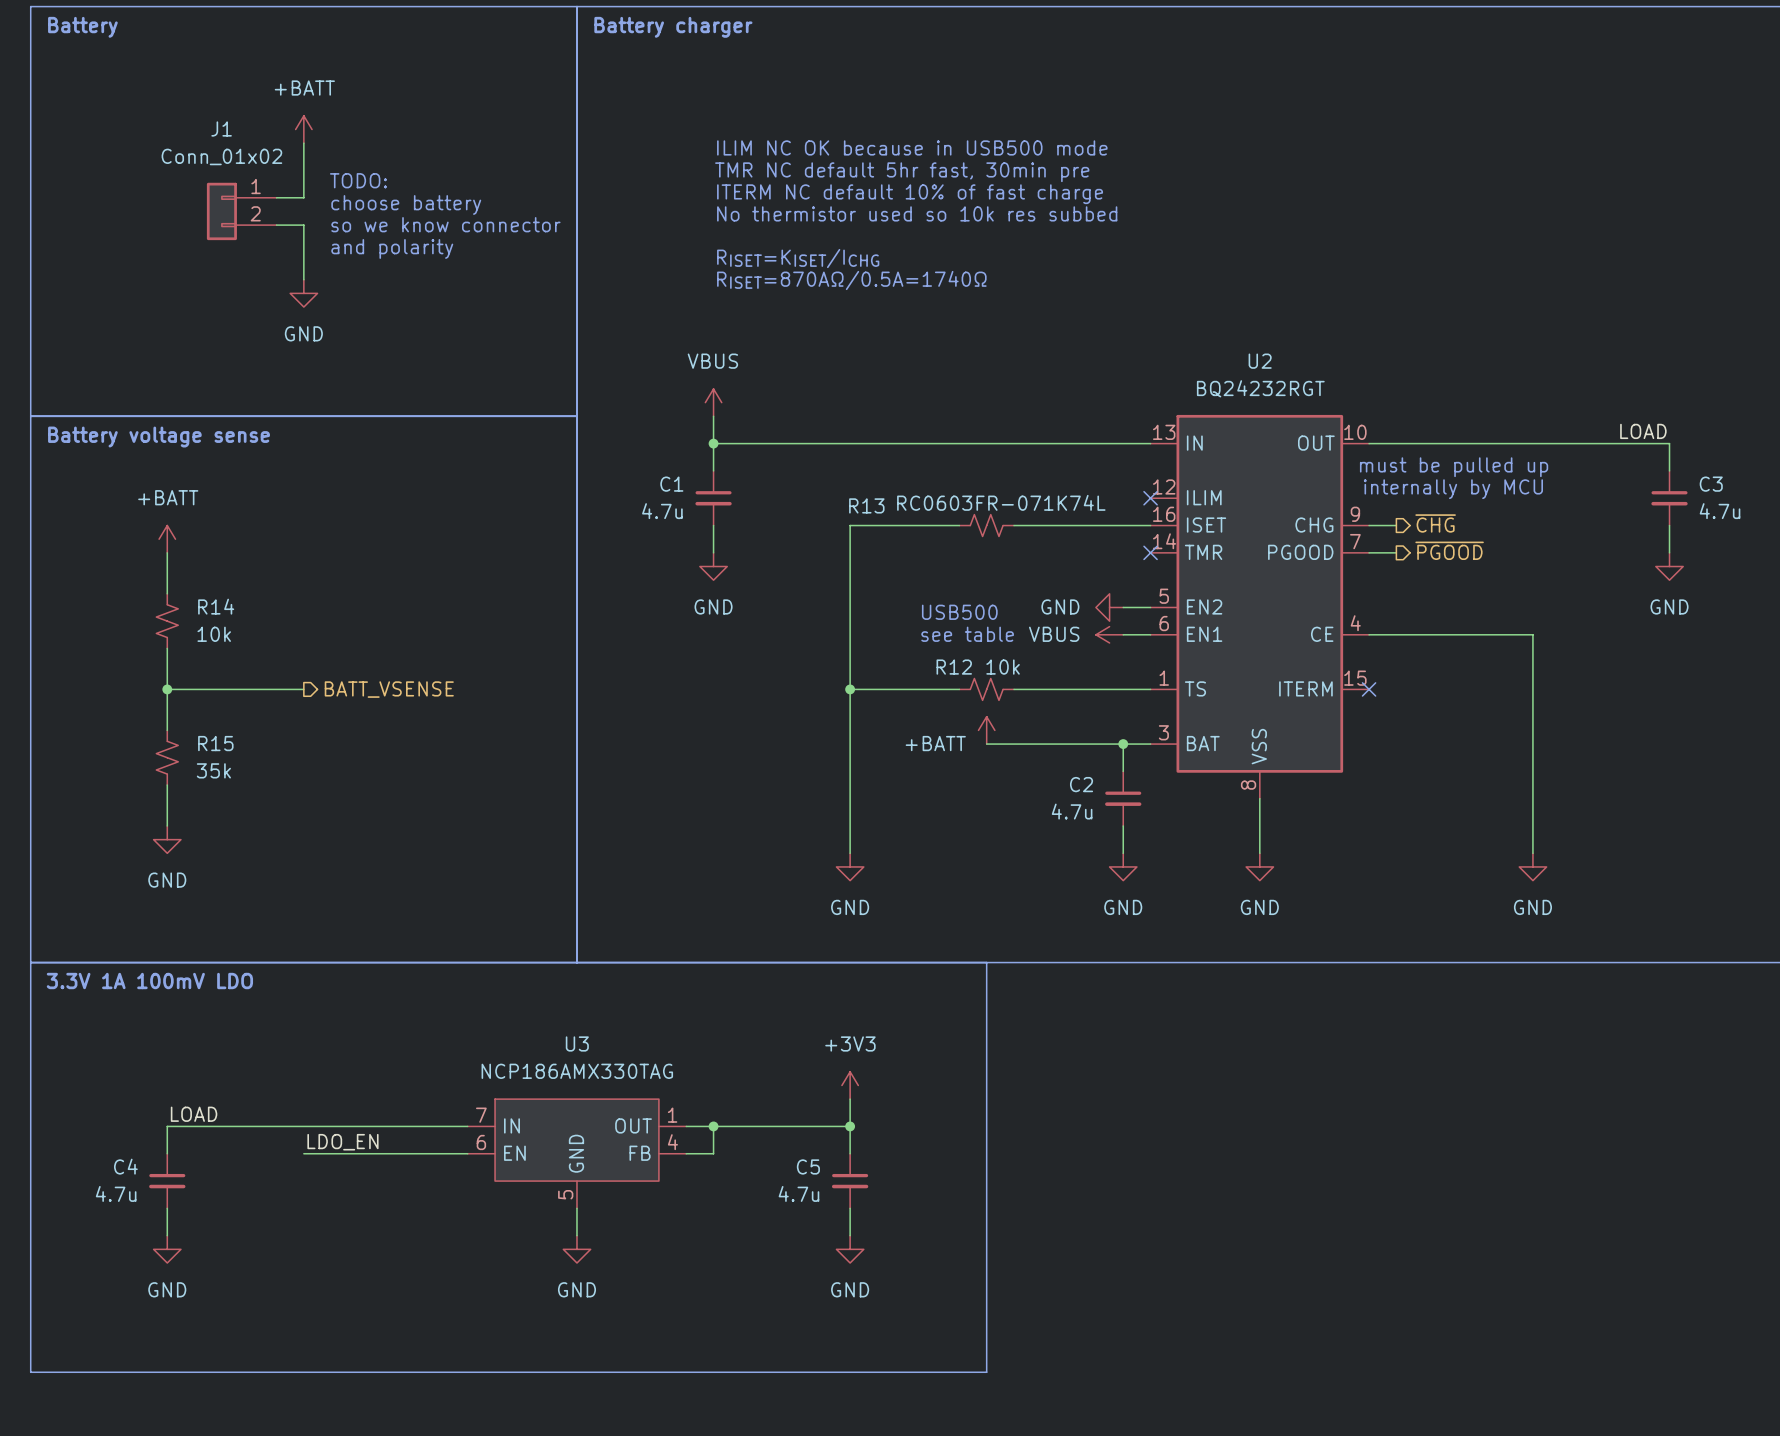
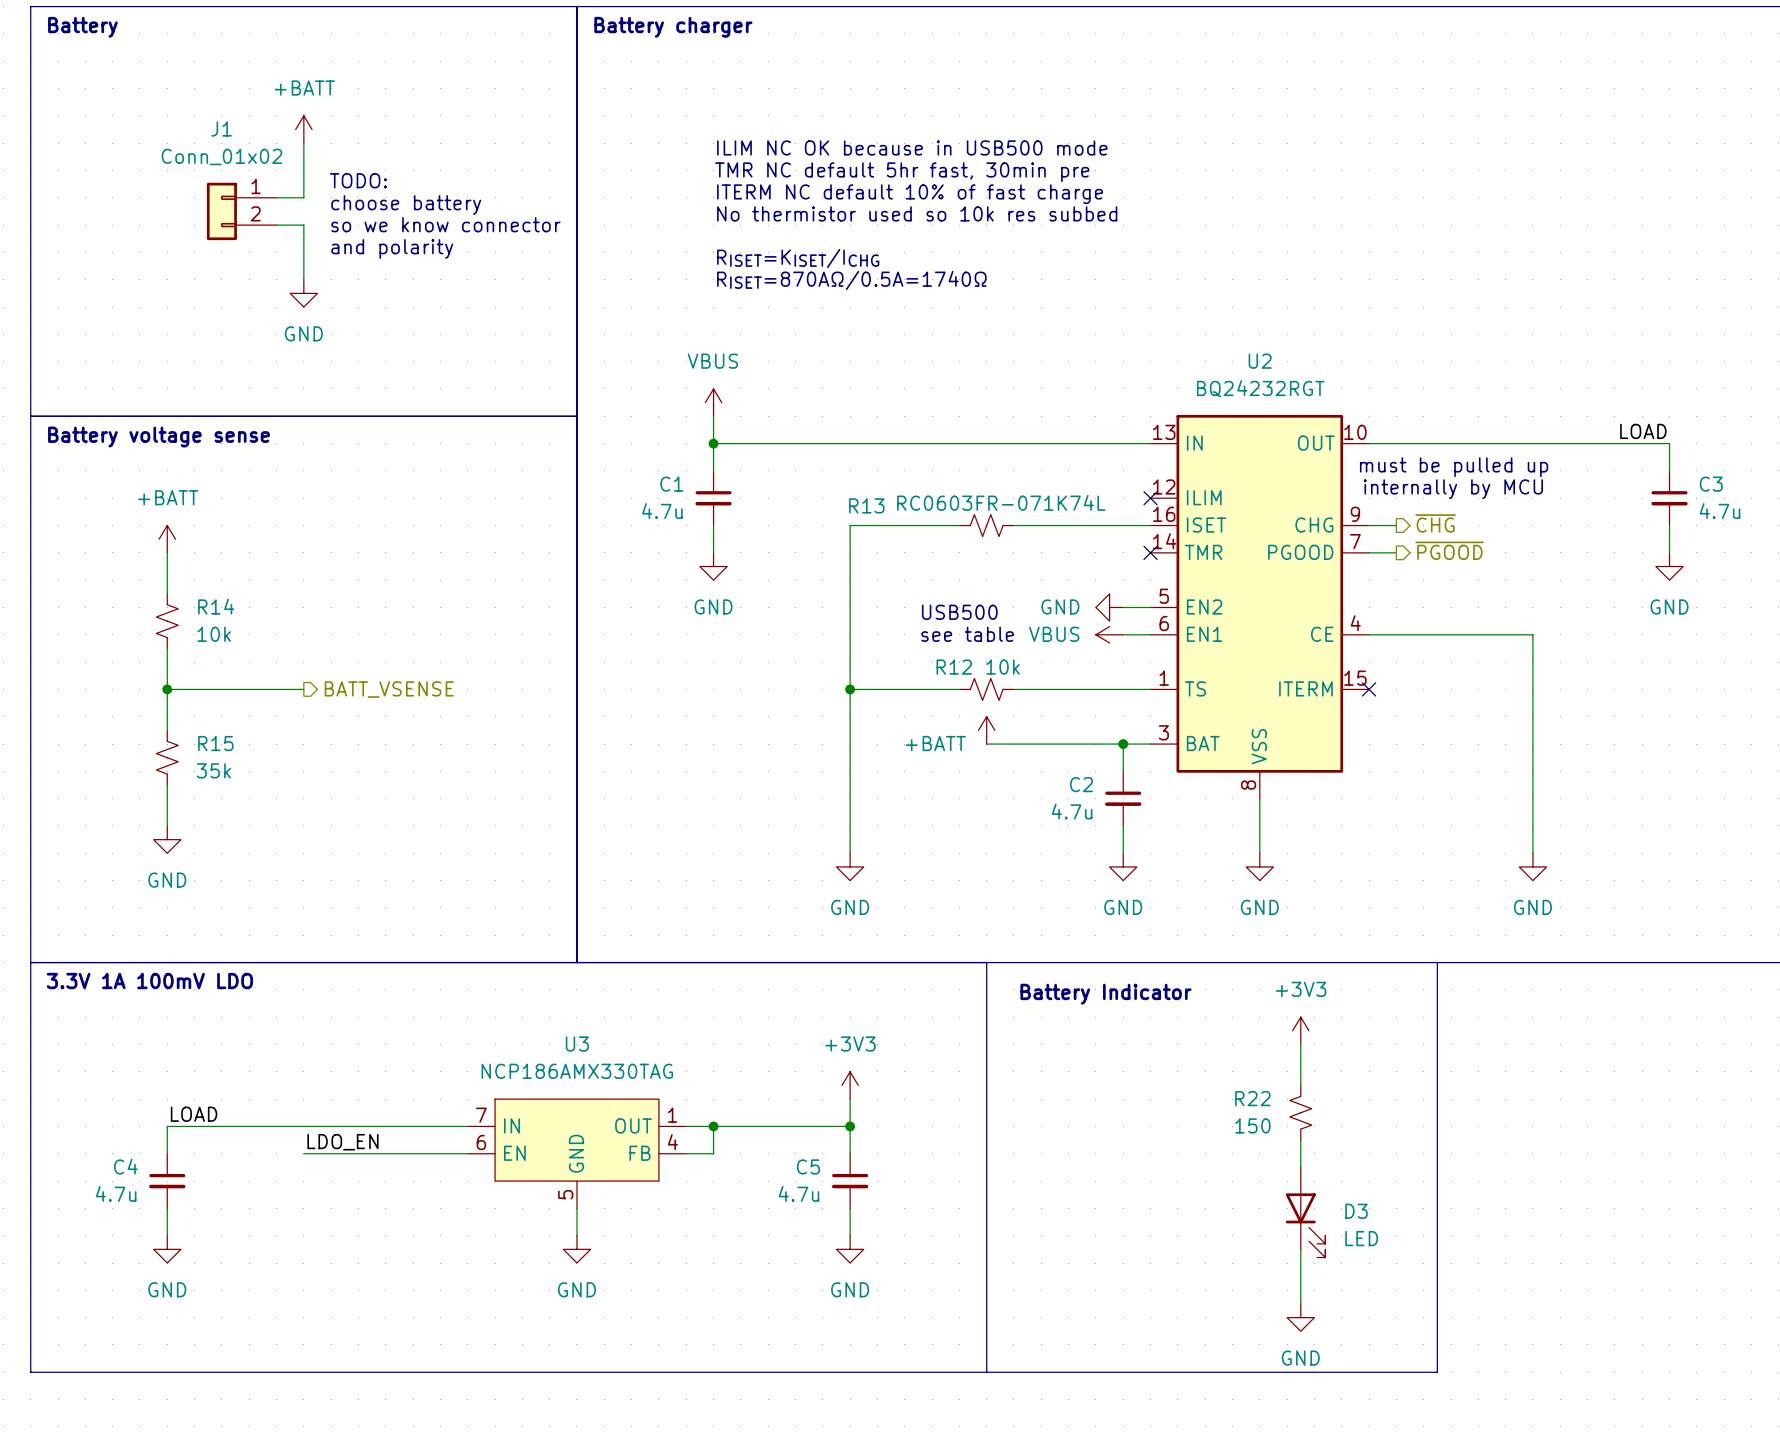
line: none -> (1437, 962) (1437, 1372) (986, 1372)
text: none -> Battery Indicator (1105, 994)
power symbol: none -> +3V3 (1300, 1030)
wire: none -> (1300, 1044) (1300, 1085)
R22: none -> 150 (1300, 1112)
wire: none -> (1300, 1140) (1300, 1167)
D3: none -> LED (1305, 1212)
wire: none -> (1300, 1249) (1300, 1303)
power symbol: none -> GND (1300, 1317)

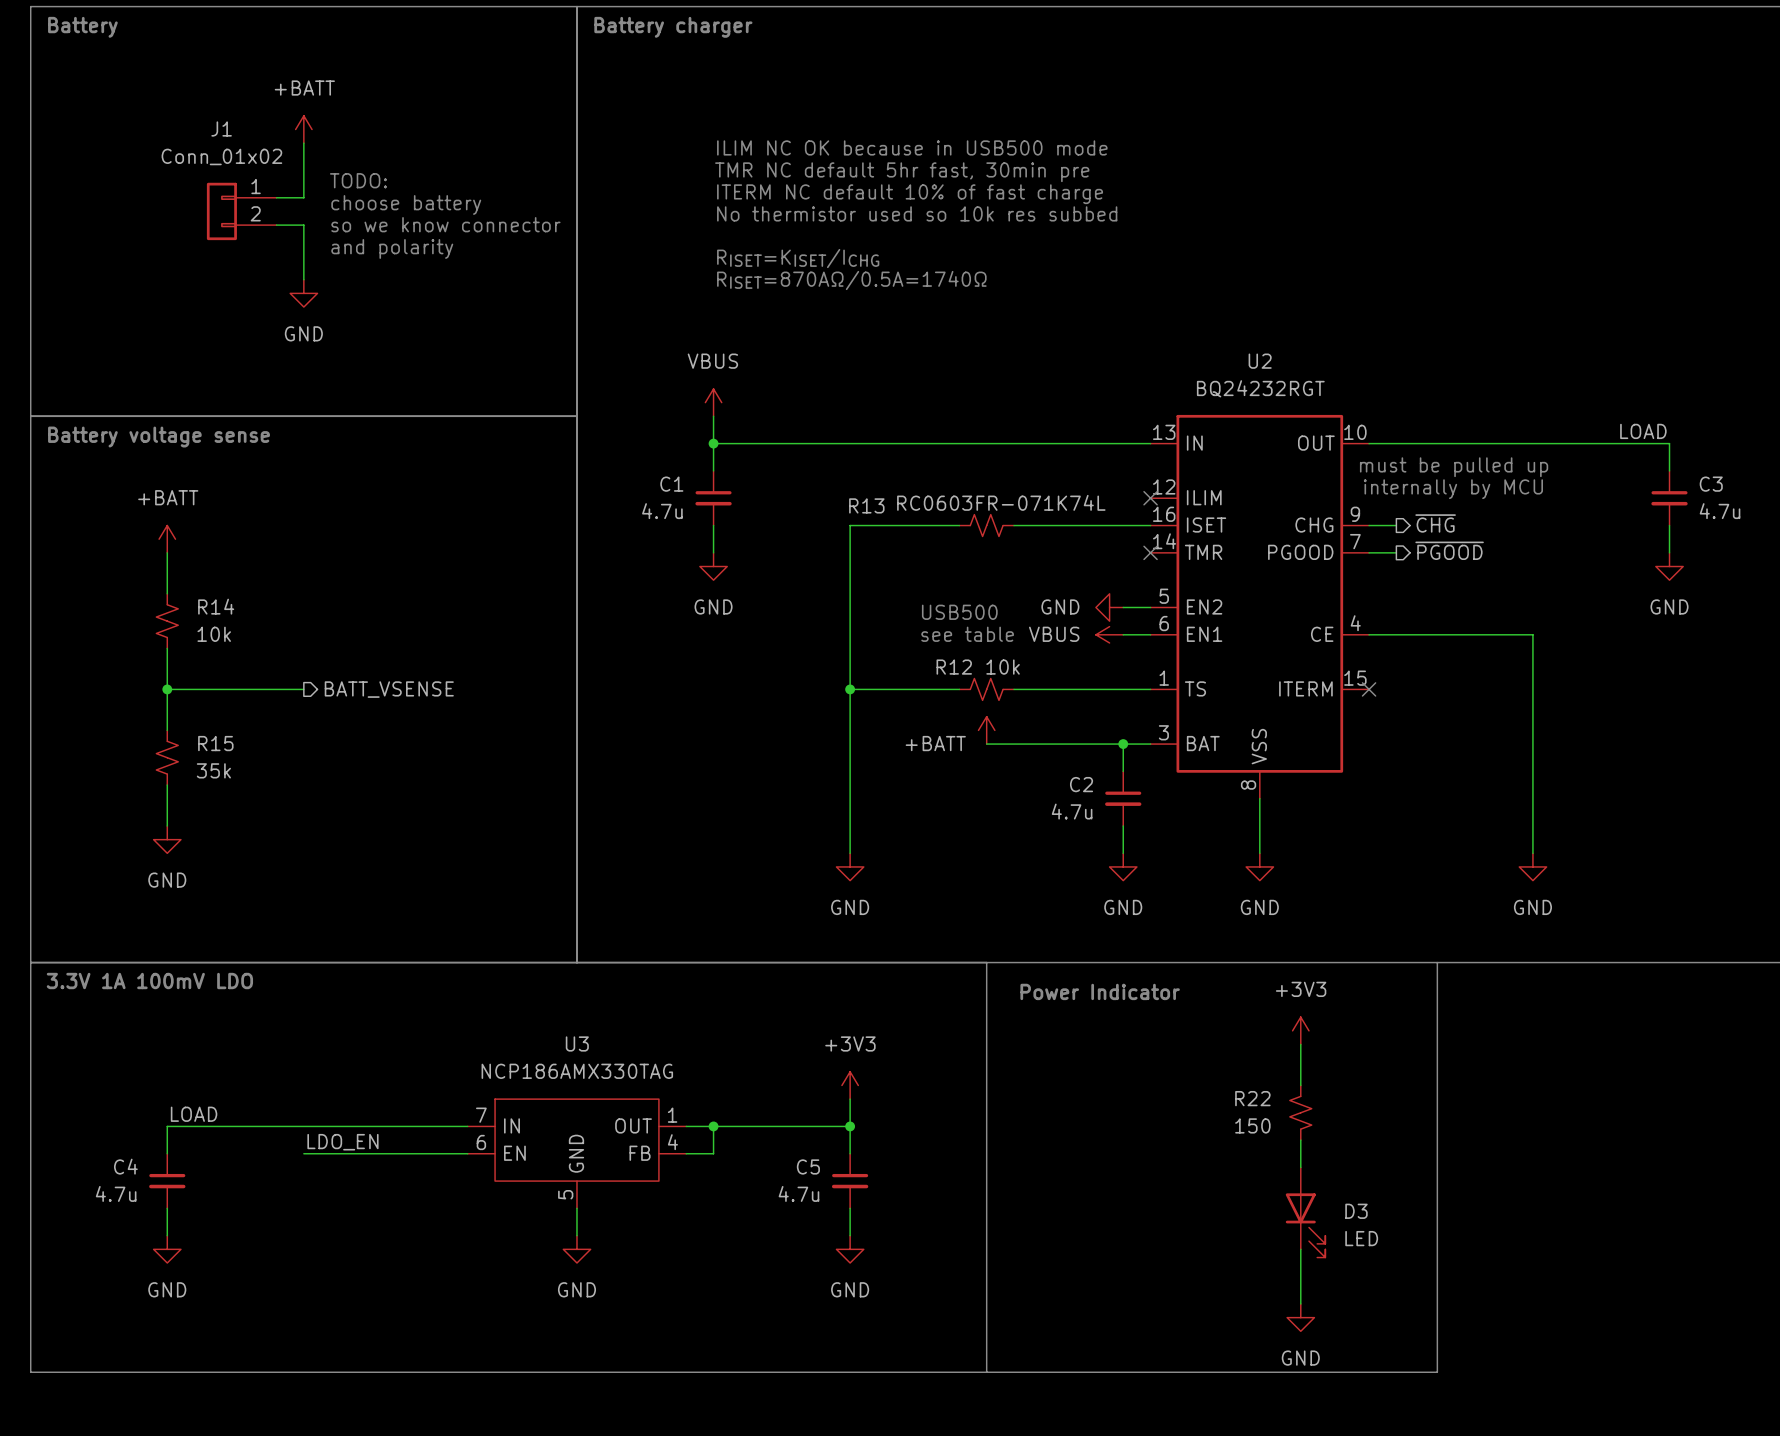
text: Battery Indicator (1105, 994) -> Power Indicator (1100, 991)

